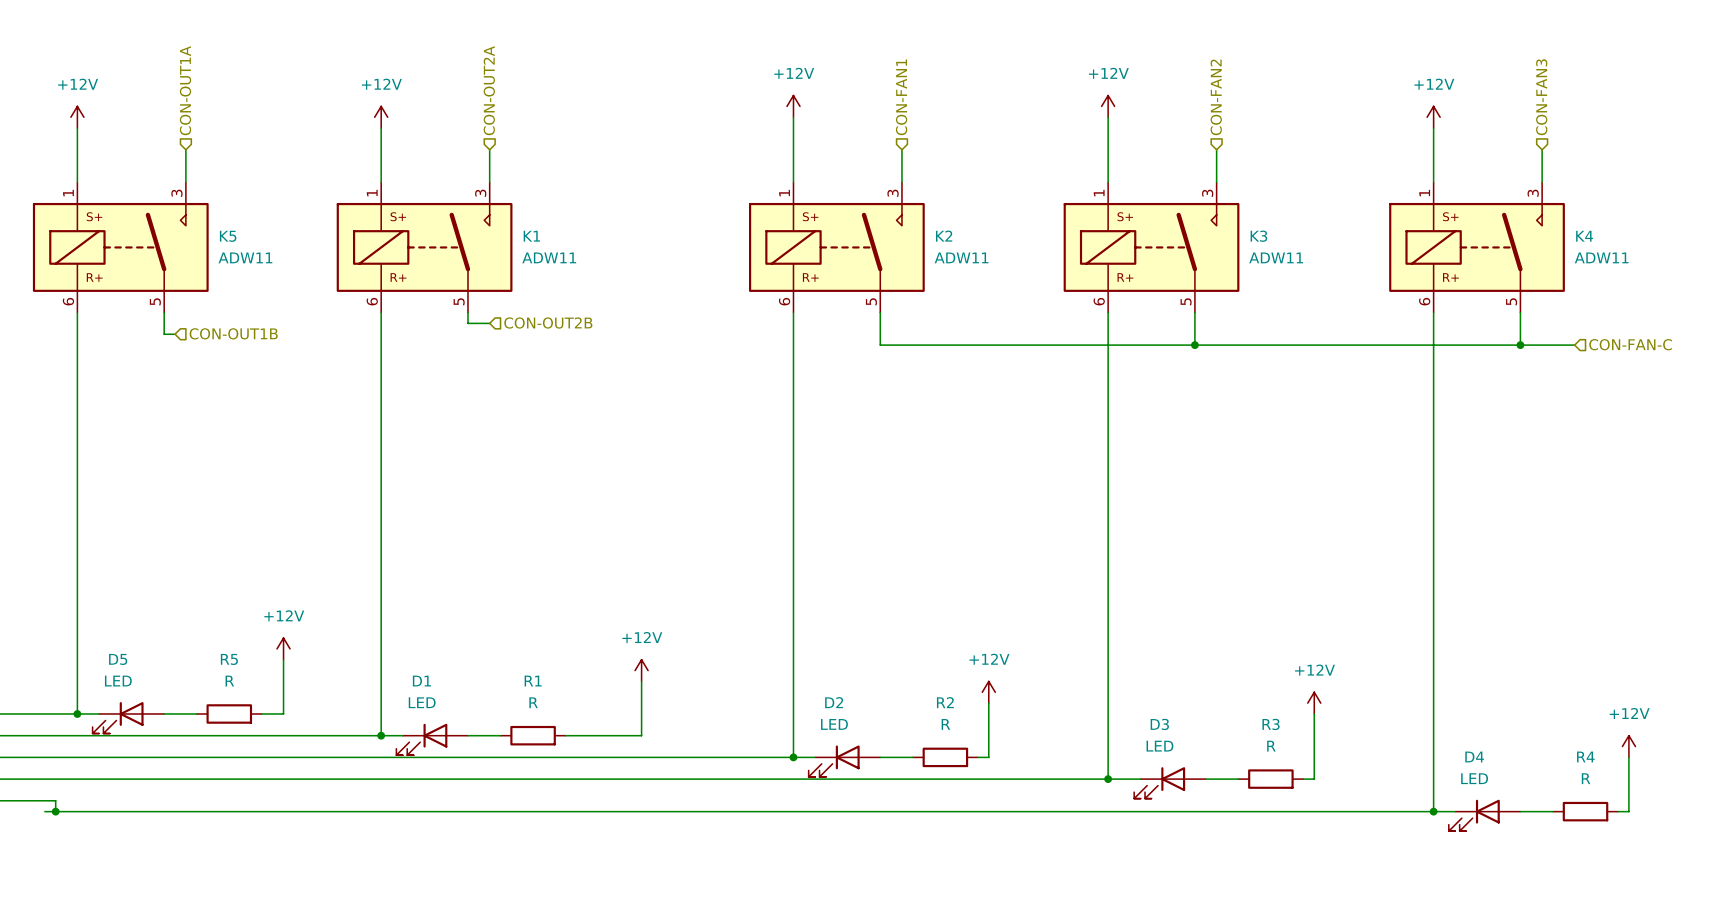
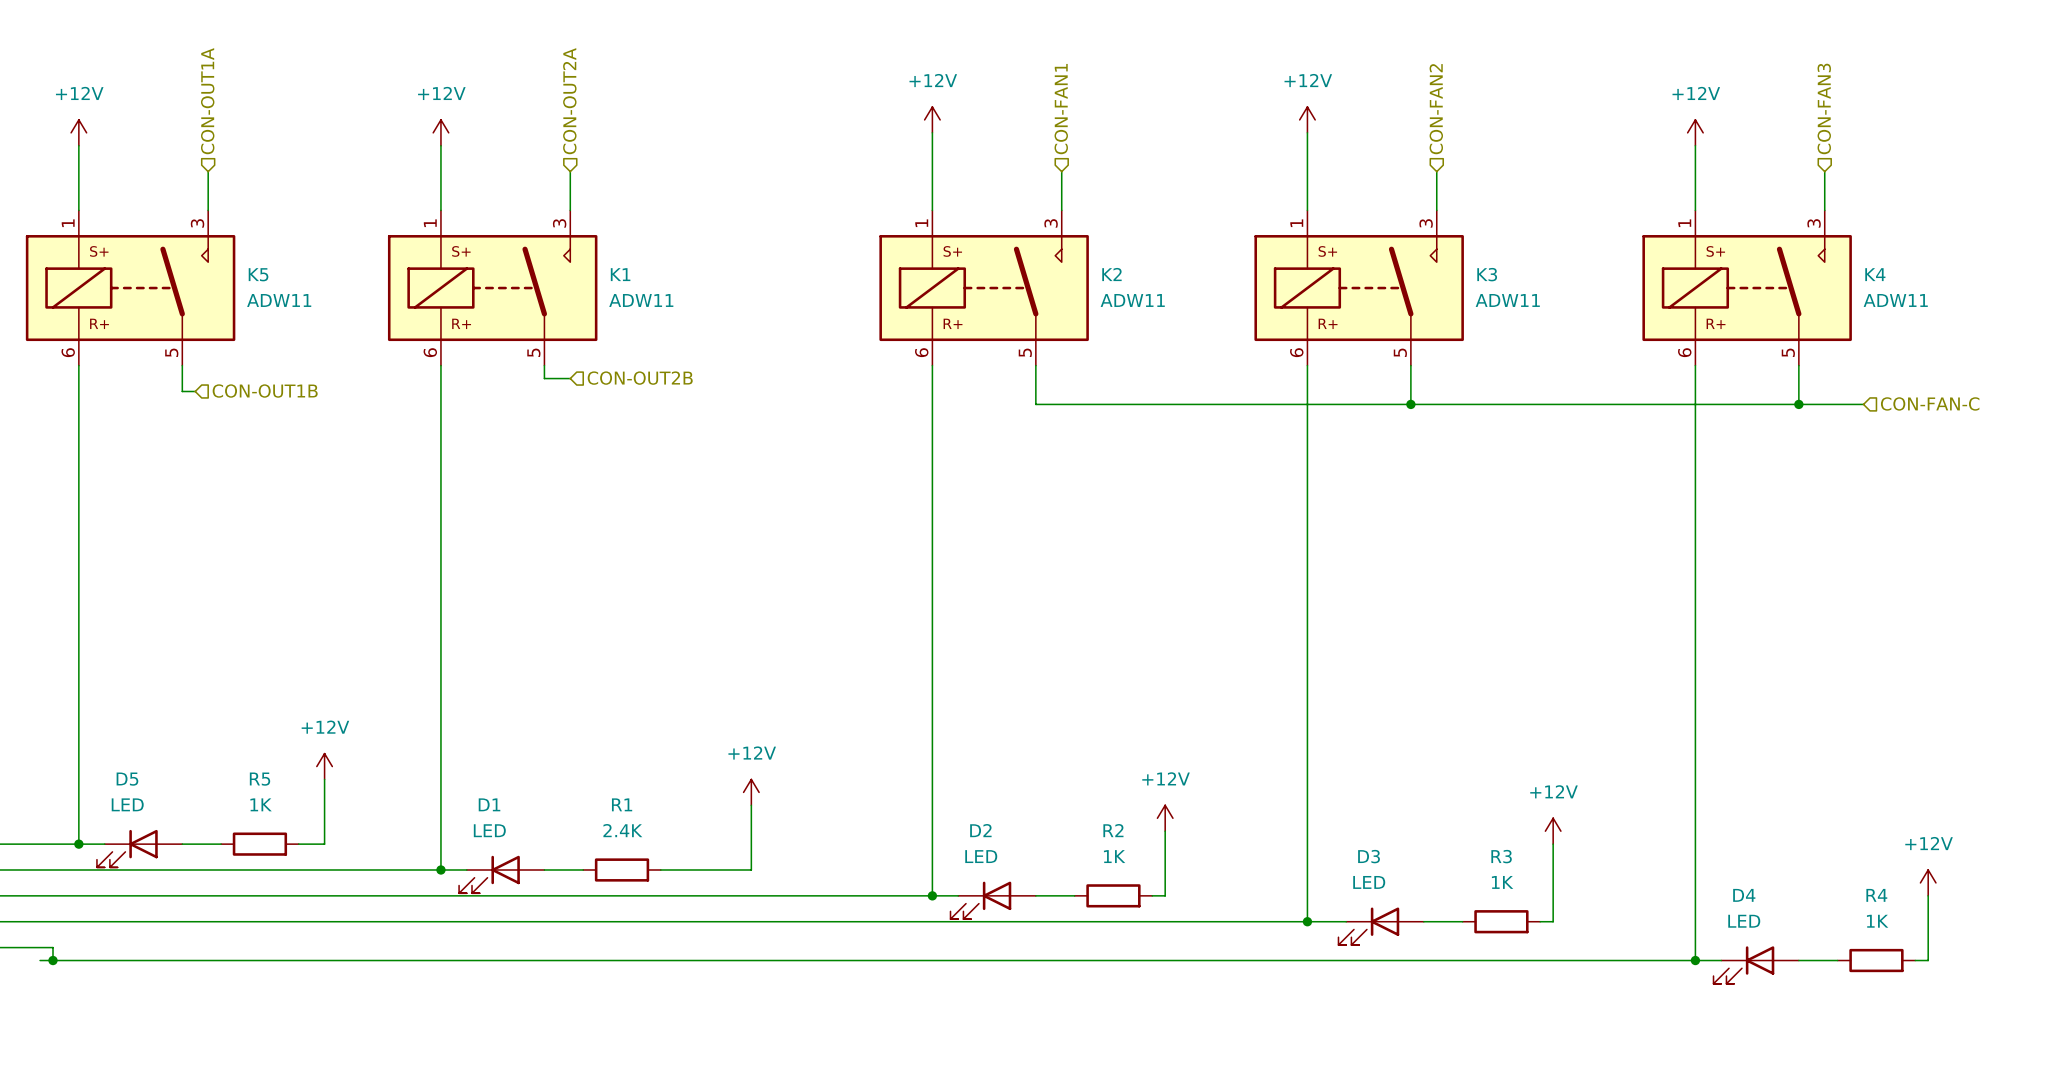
R5 value: R (229, 681) -> 1K (261, 804)
R1 value: R (533, 702) -> 2.4K (622, 830)
R2 value: R (945, 724) -> 1K (1114, 856)
R3 value: R (1271, 746) -> 1K (1502, 882)
R4 value: R (1586, 778) -> 1K (1877, 921)

